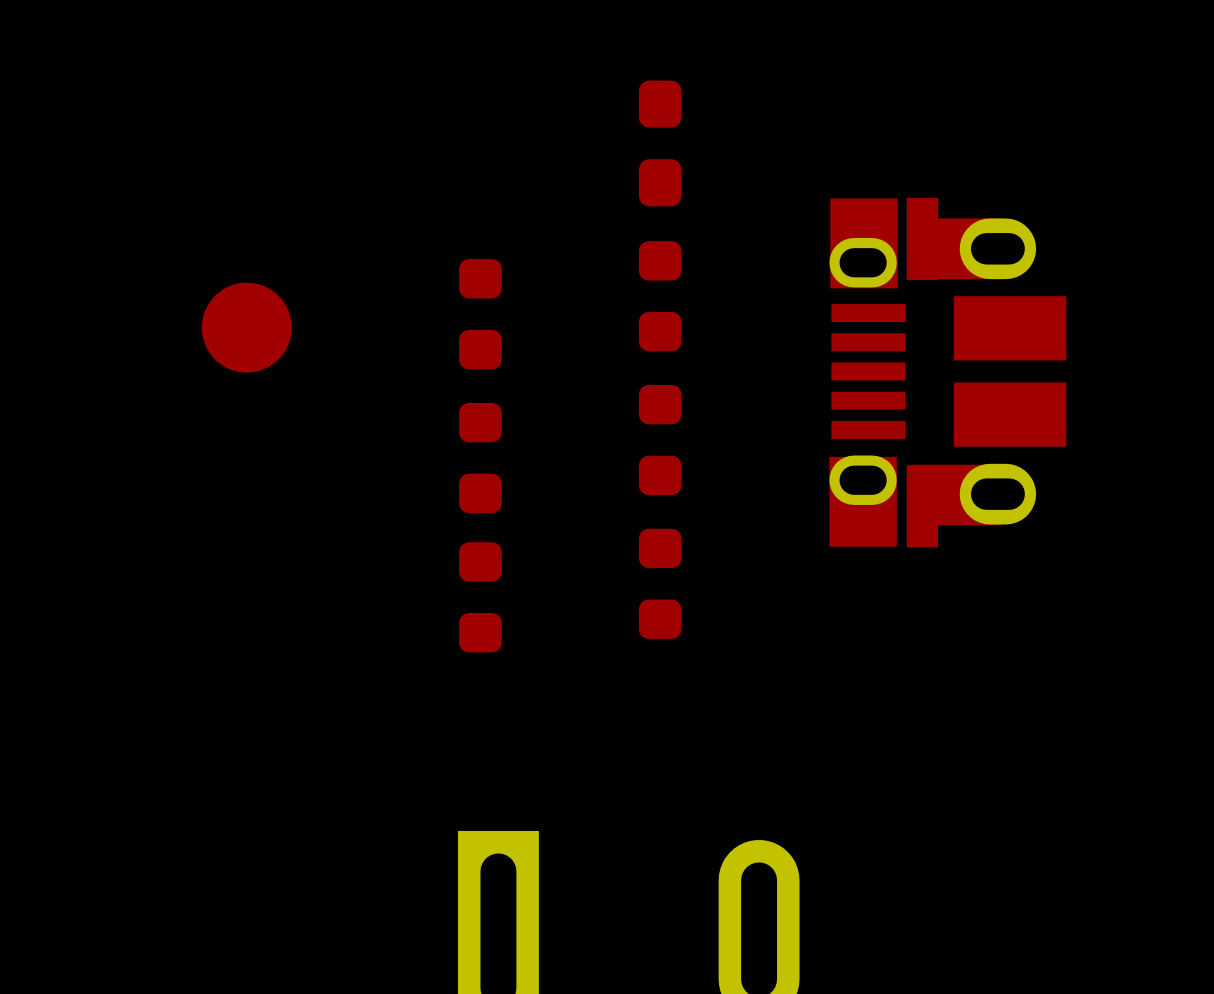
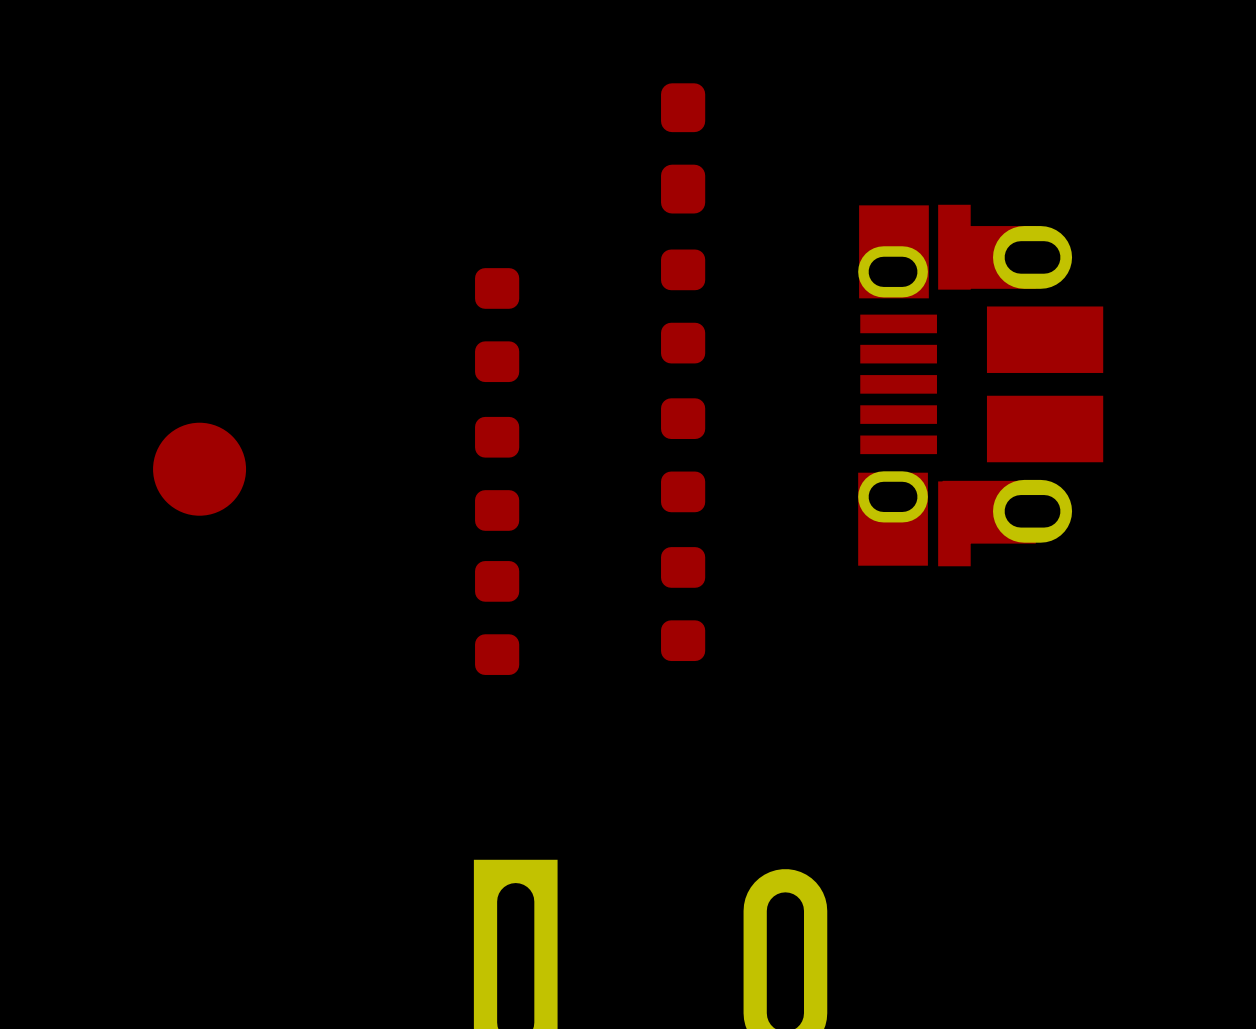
part position: (246, 327) -> (199, 469)

